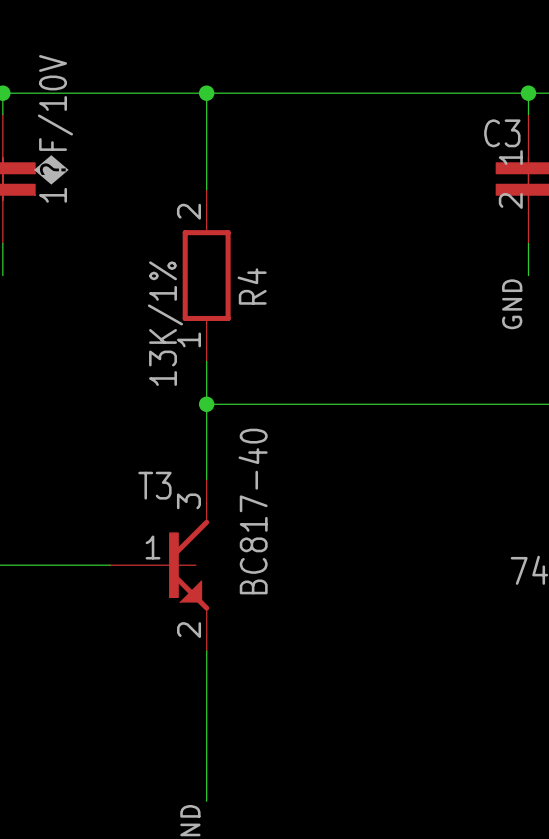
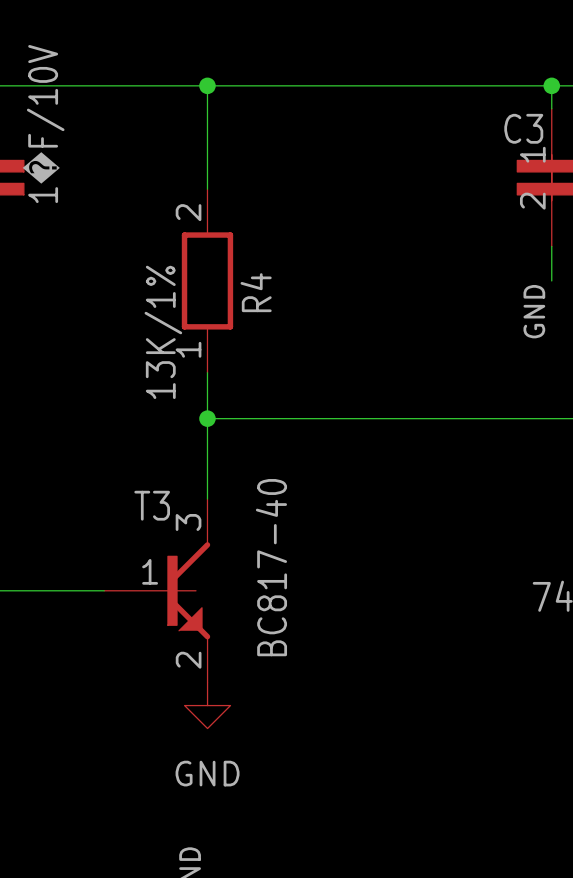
T3 value position: BC817-40 (253, 511) -> BC817-40 (271, 567)
wire: (206, 651) (206, 801) -> none
power symbol: none -> GND (207, 705)

